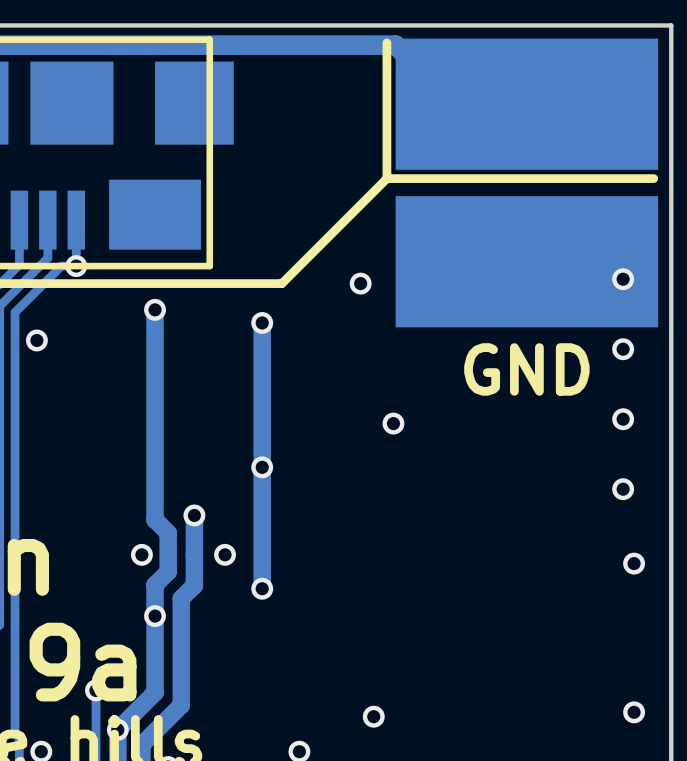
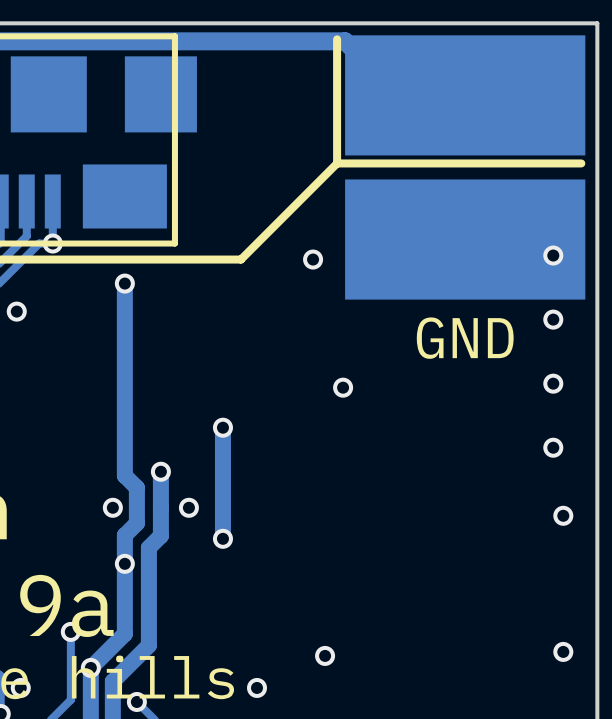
track: (262, 322) (262, 467) -> none
via: (262, 322) -> none

